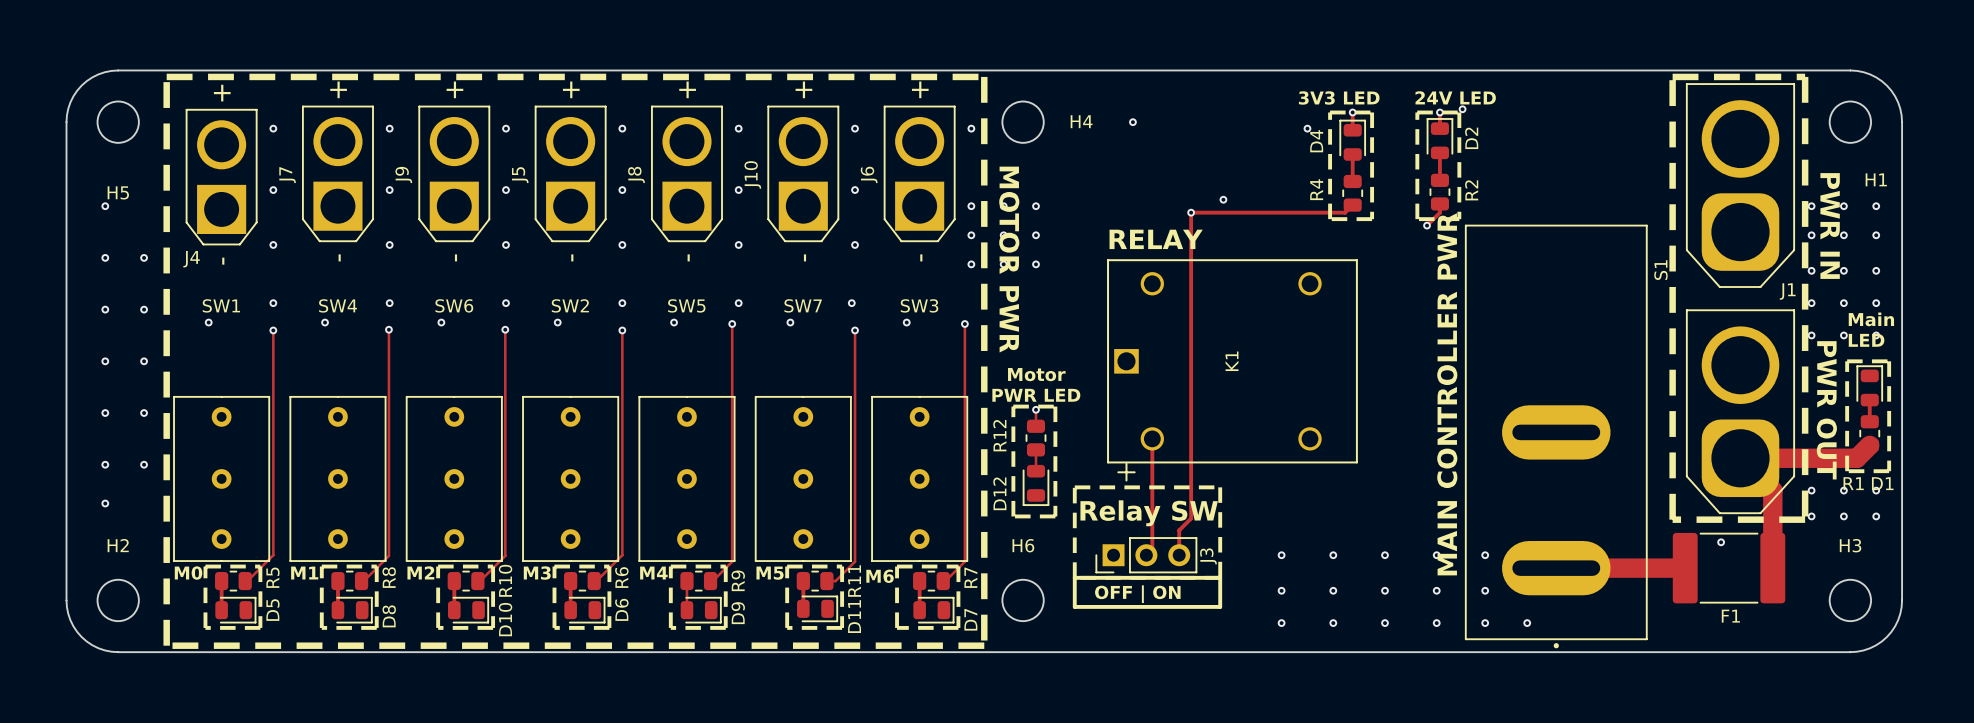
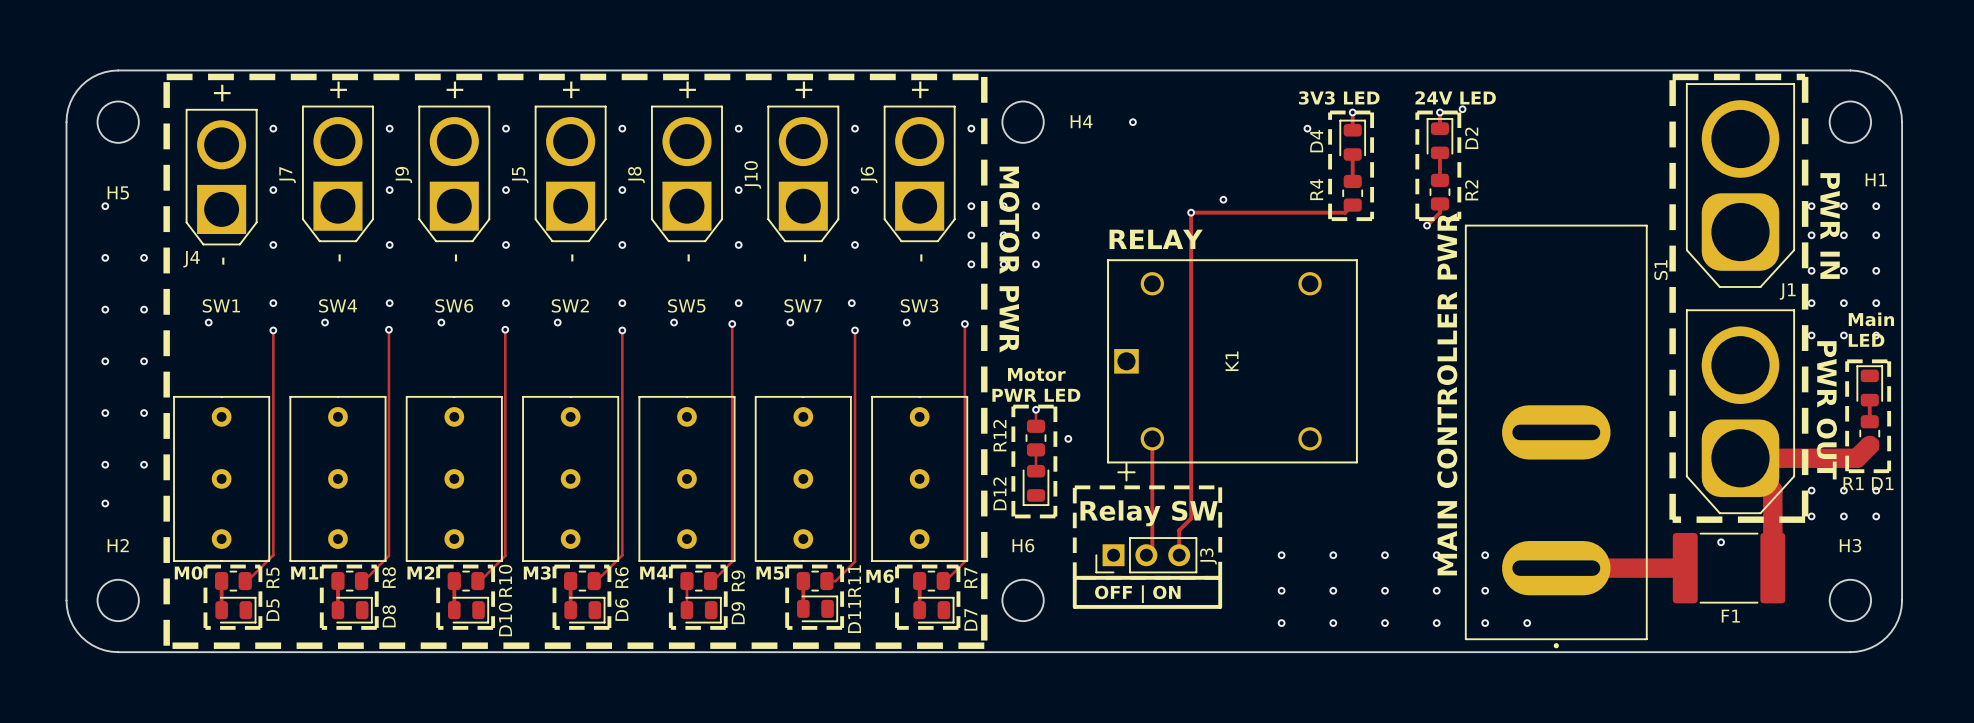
via: none -> (1068, 438)

